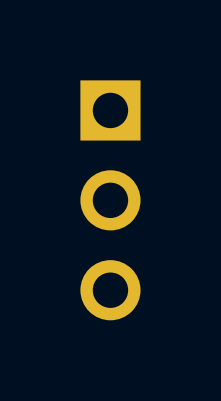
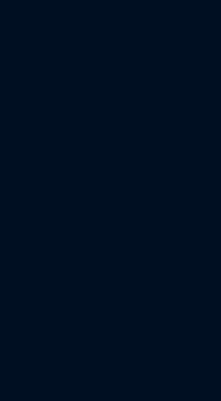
part: (110, 200) -> none

